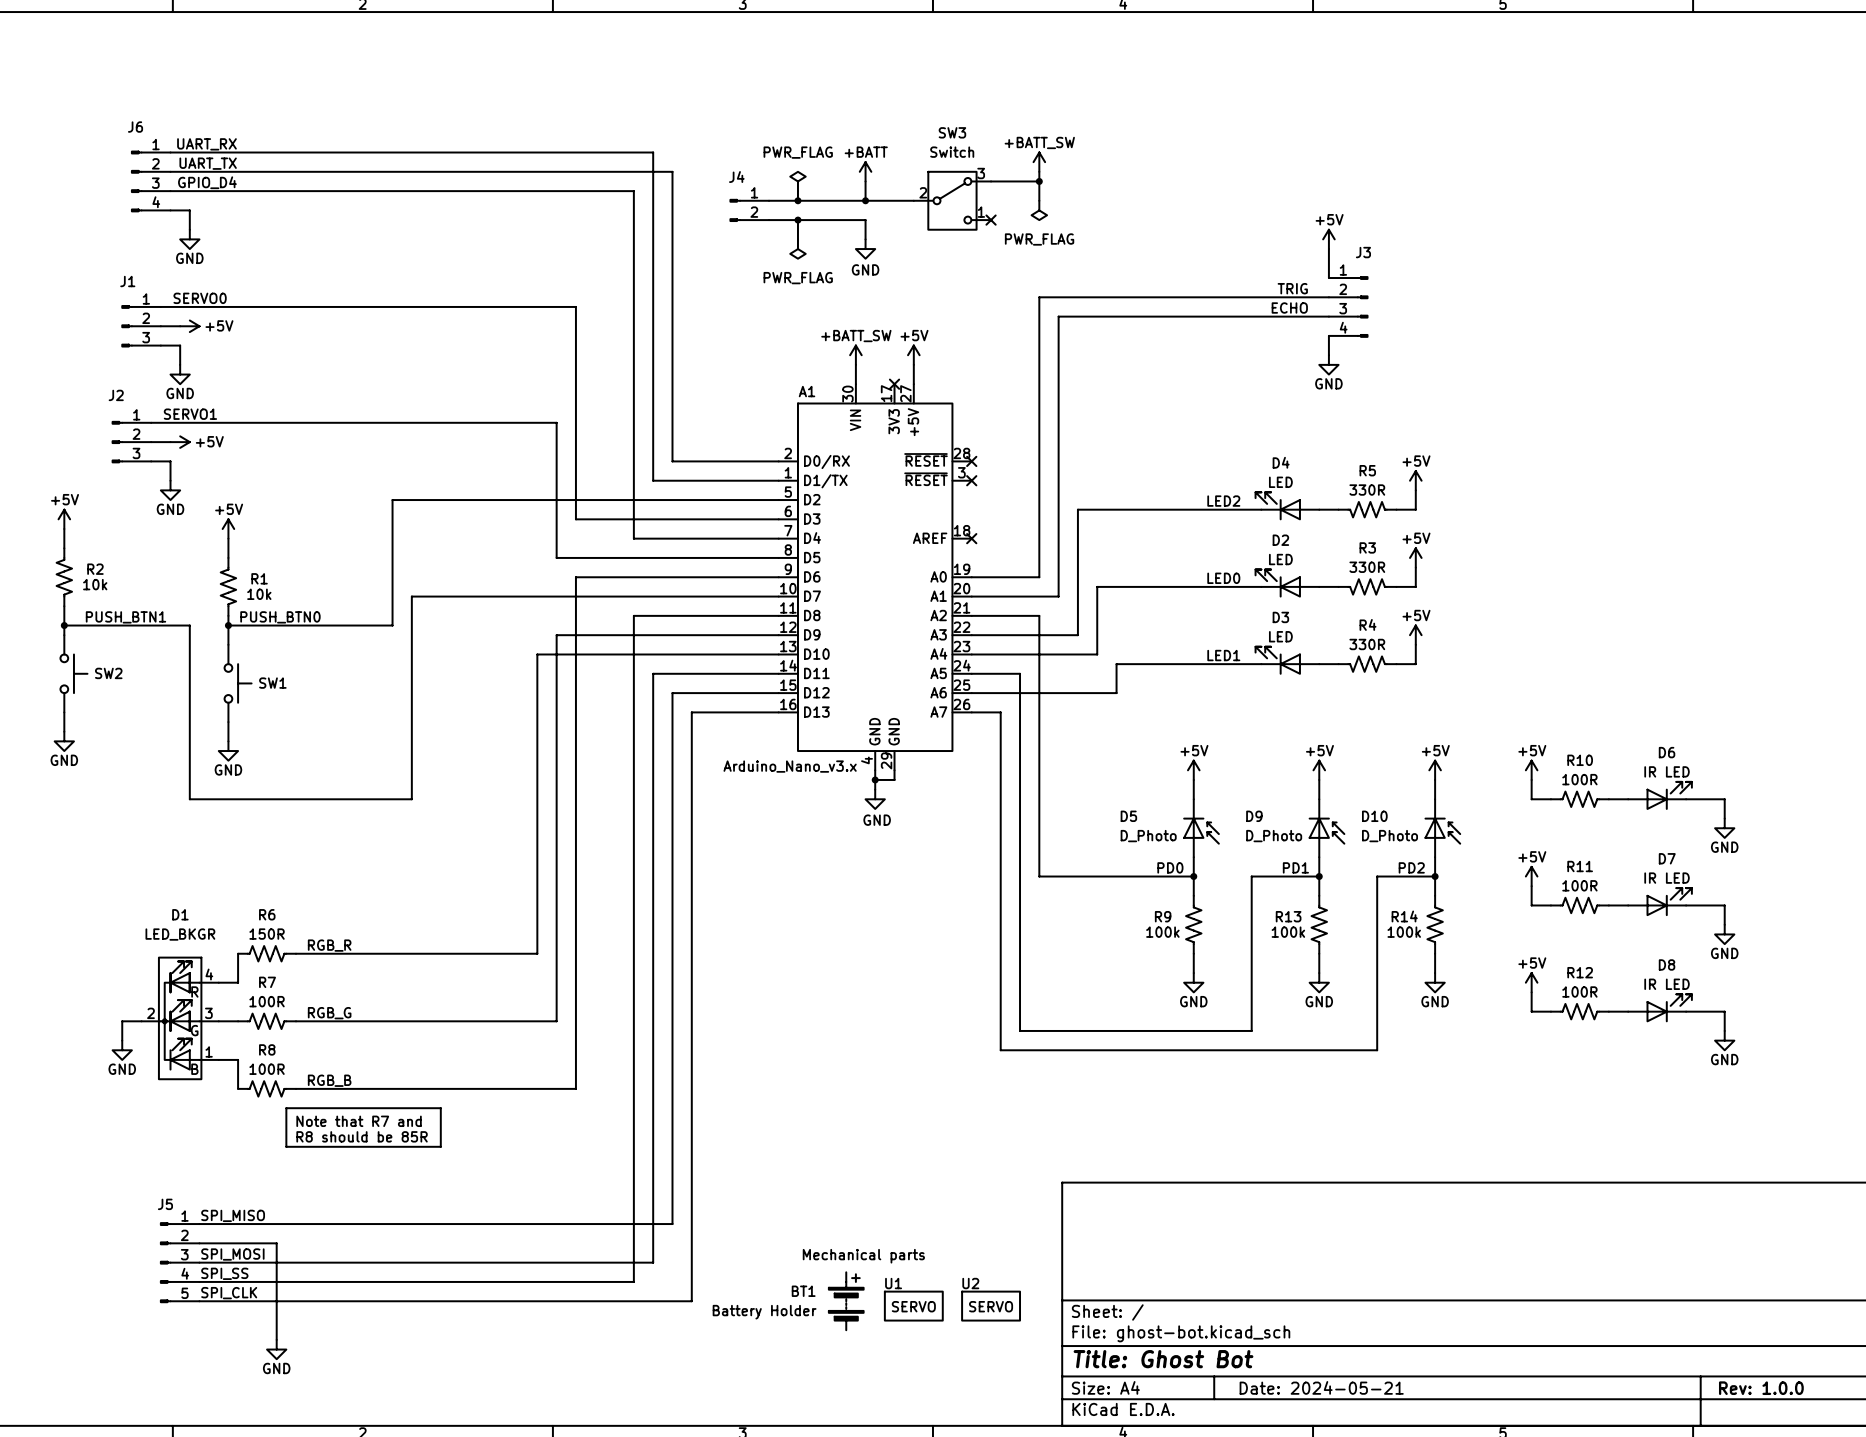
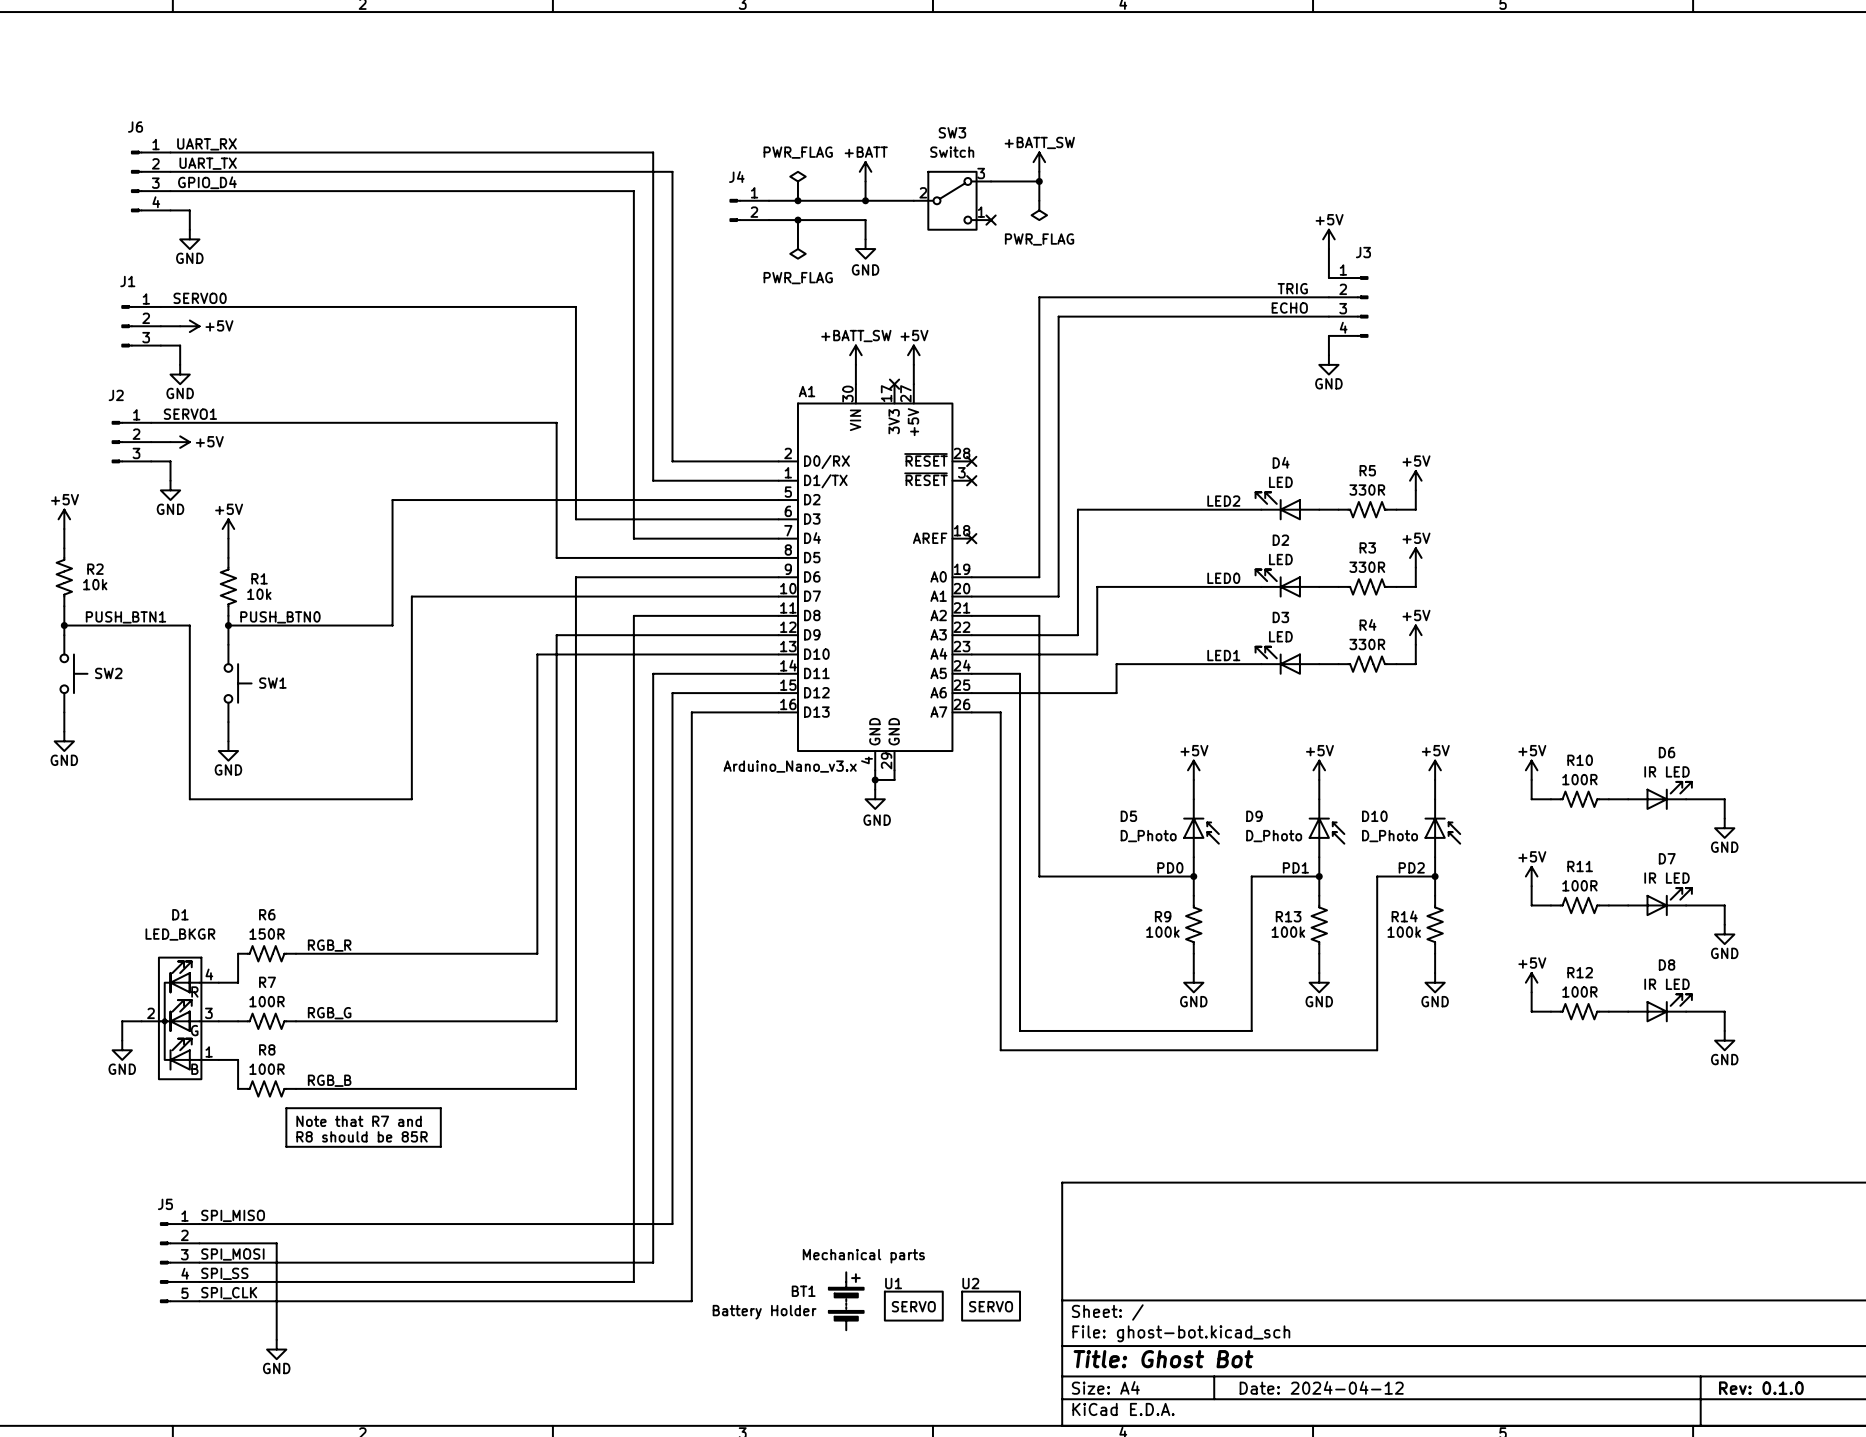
title block: Date: 2024-05-21 (1321, 1387) -> Date: 2024-04-12 (1321, 1387)
title block: Rev: 1.0.0 (1761, 1388) -> Rev: 0.1.0 (1761, 1388)

